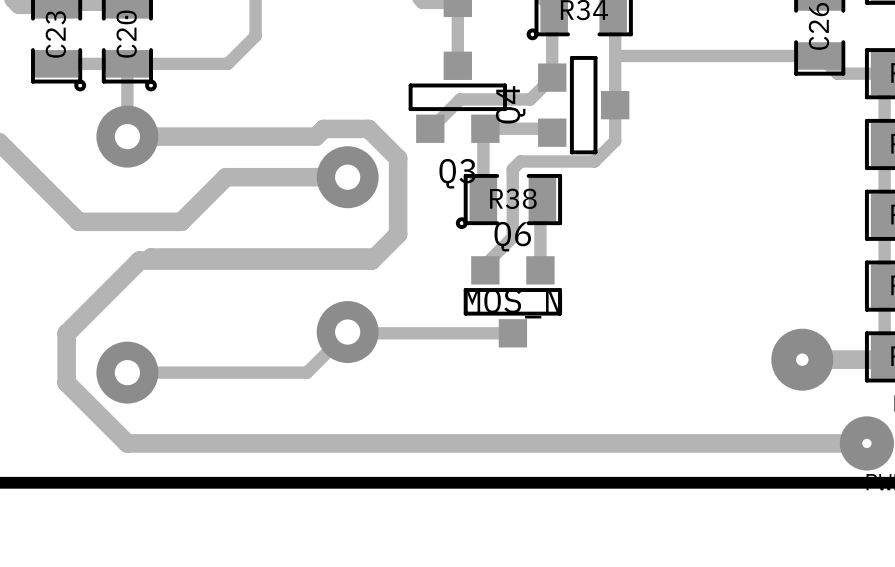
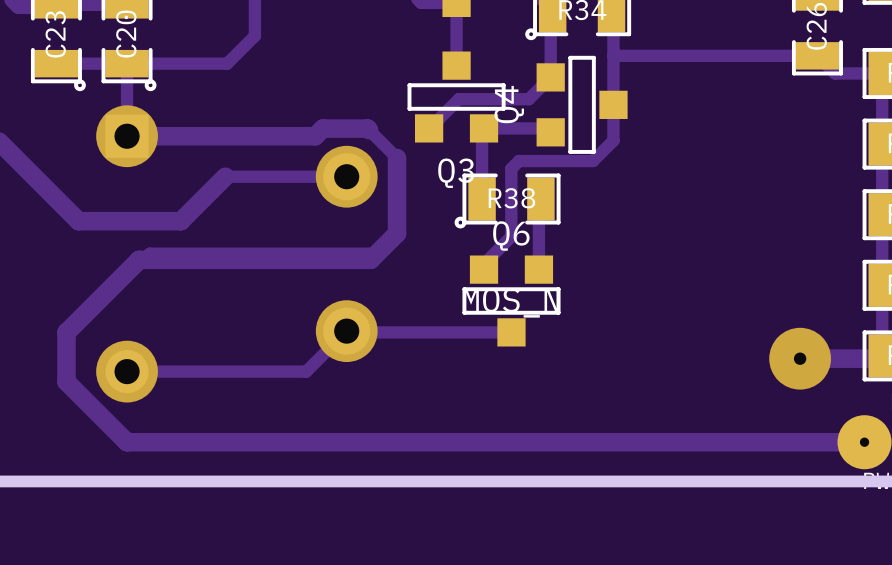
track width: thick (370, 130) (398, 158) -> thin (369, 130) (397, 157)
track width: thick (225, 177) (347, 177) -> thin (225, 176) (346, 176)

